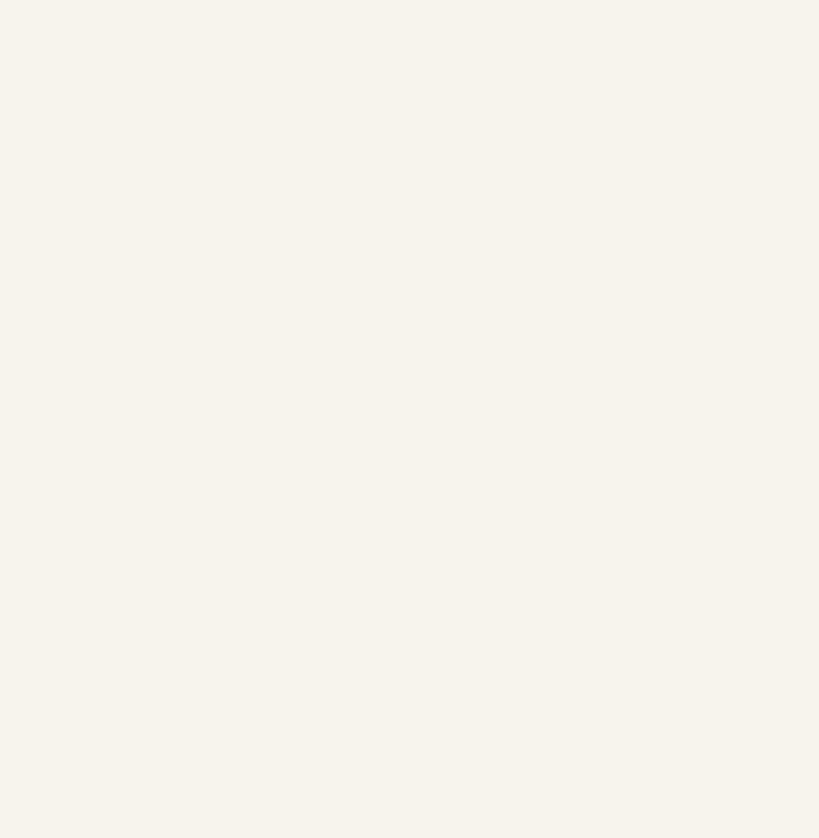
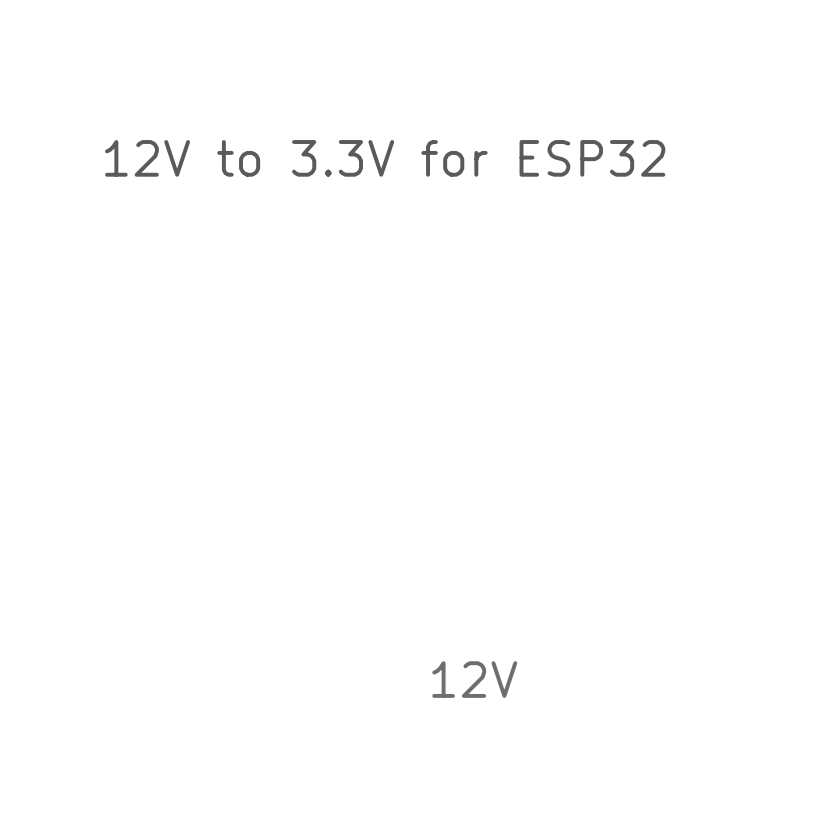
text: none -> 12V to 3.3V for ESP32 (385, 158)
label: none -> 12V (474, 679)

